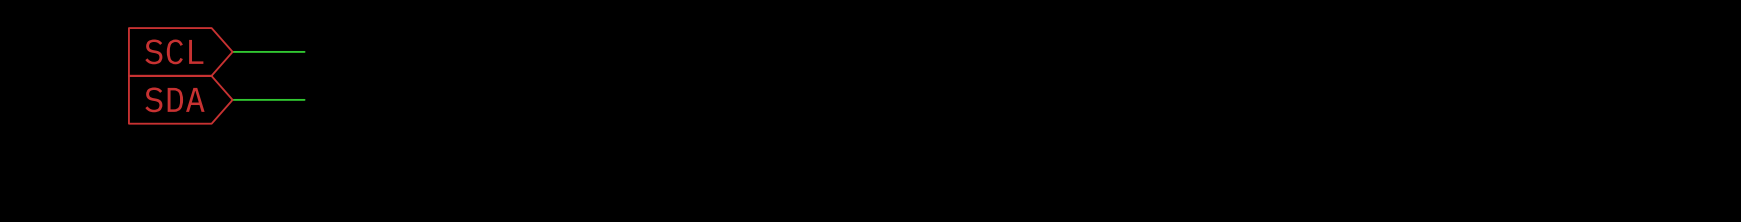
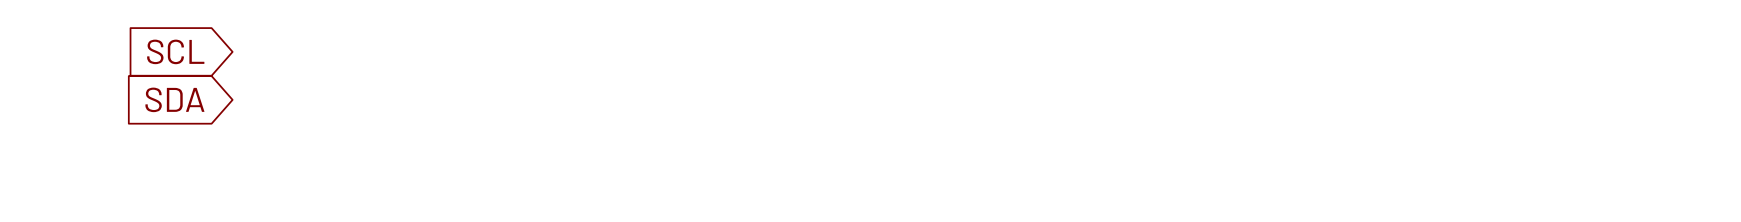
wire: (232, 51) (304, 51) -> none
wire: (232, 99) (304, 99) -> none

